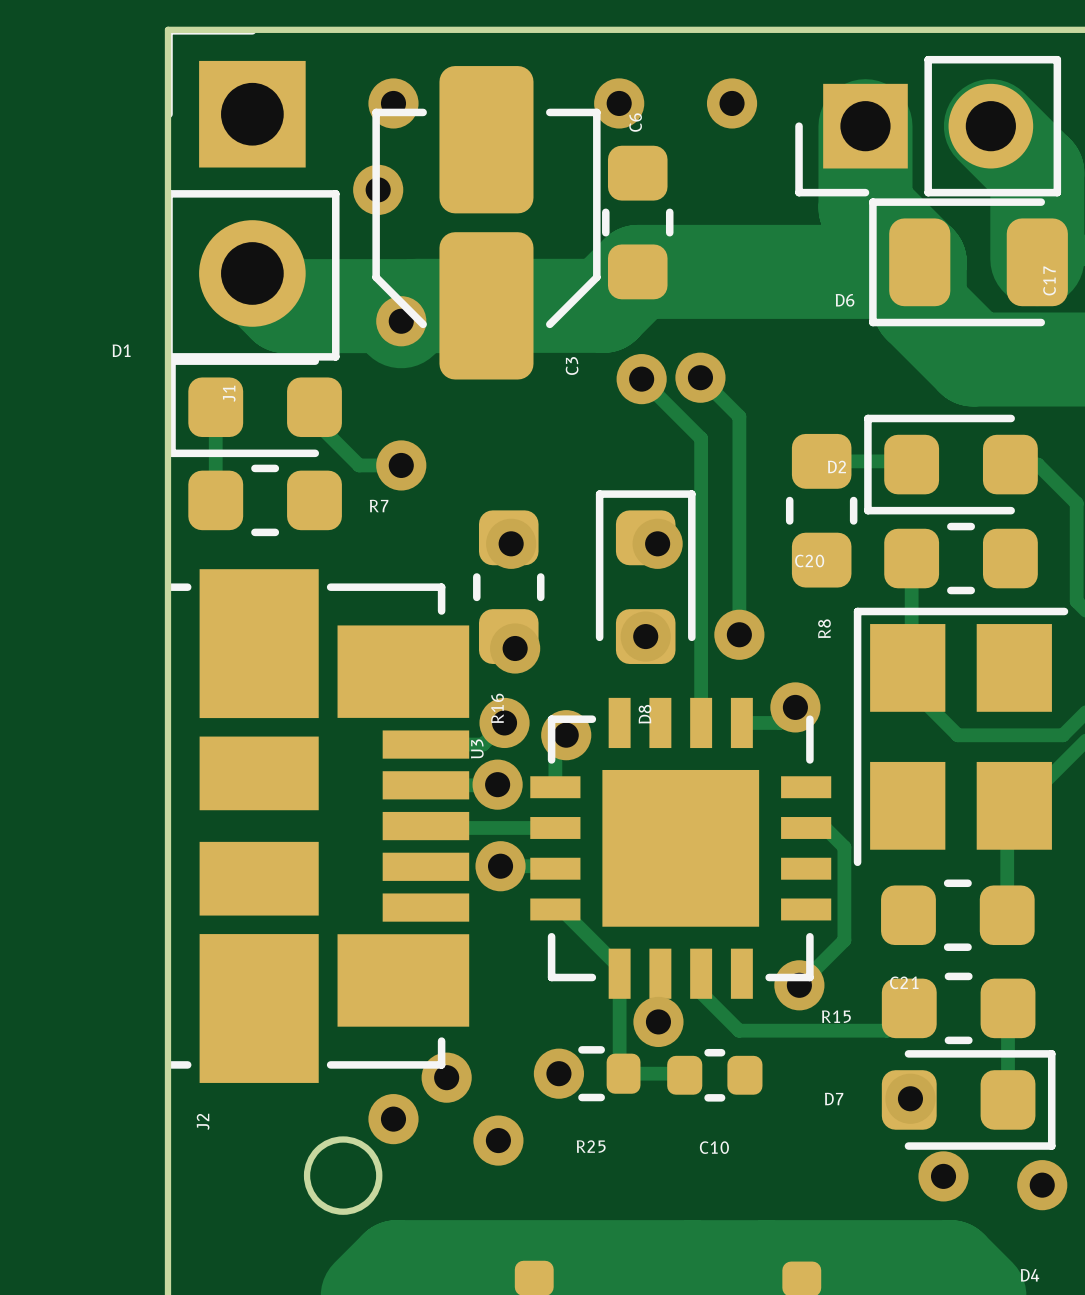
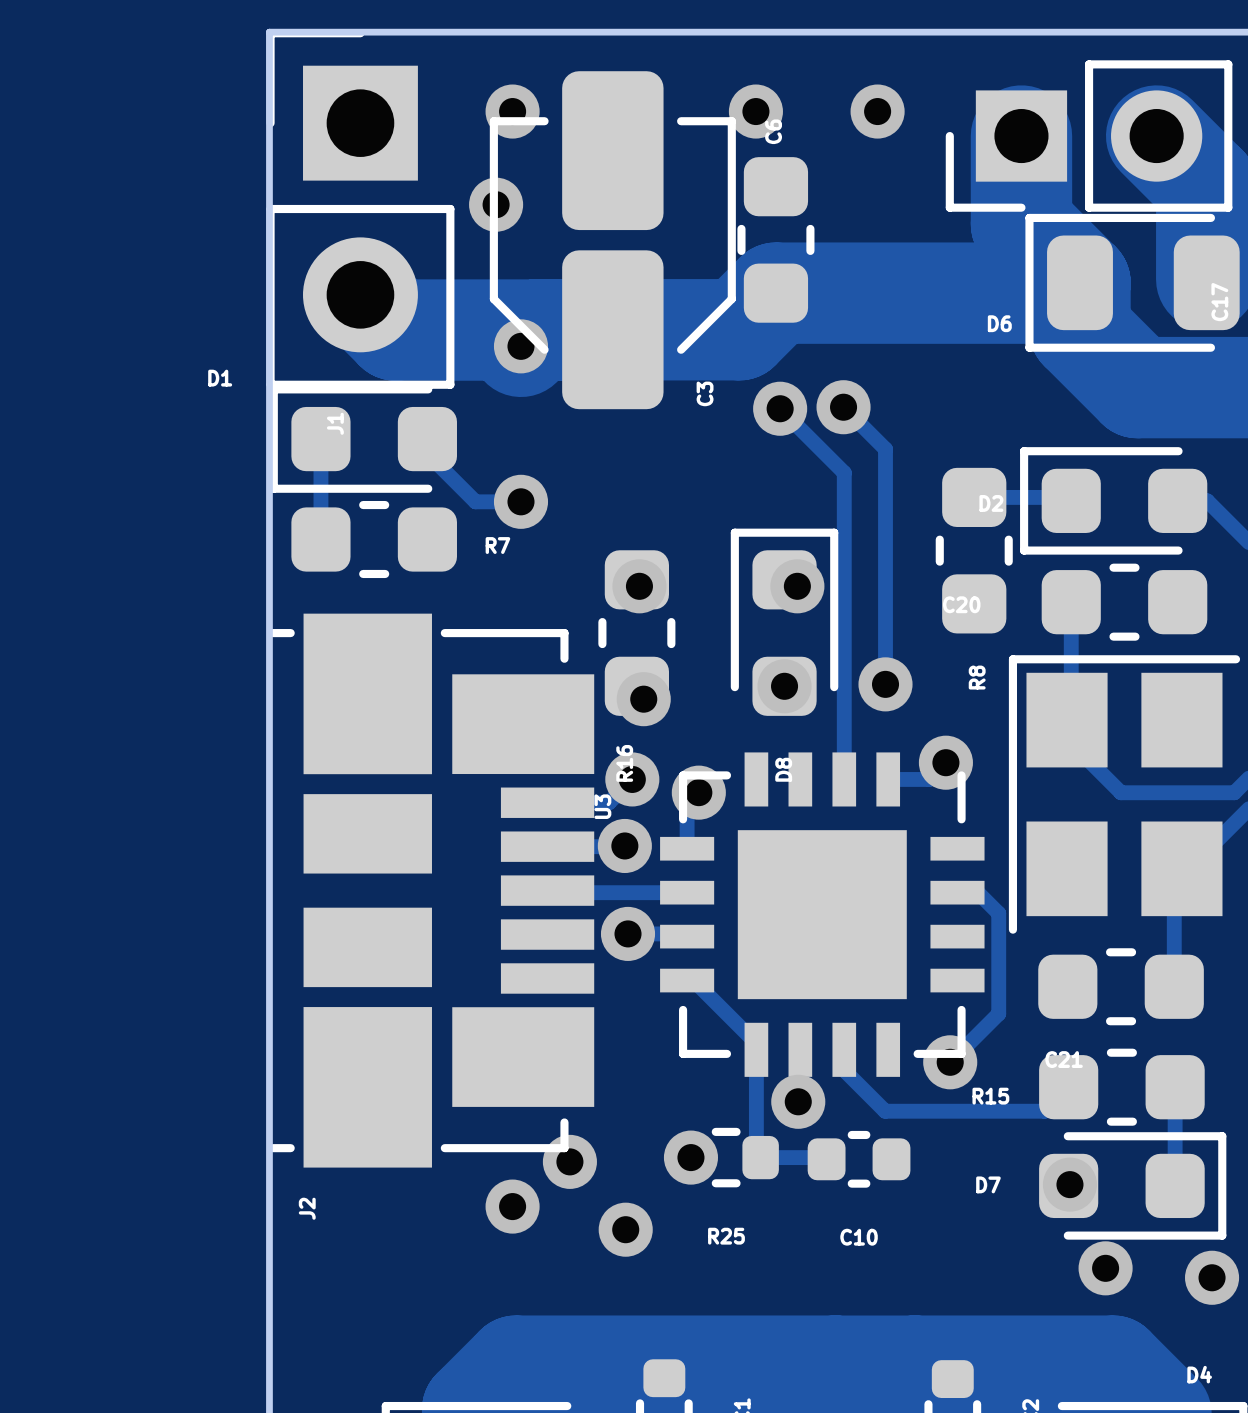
round board edge: [303, 1136, 383, 1215] -> none

